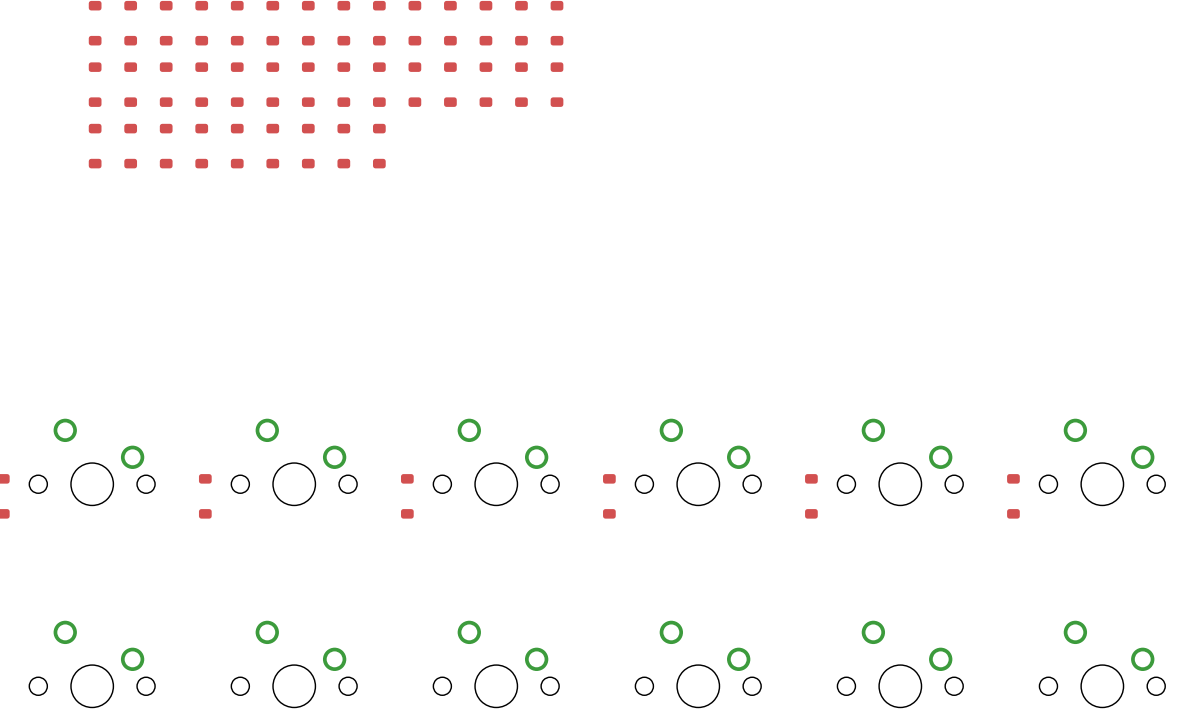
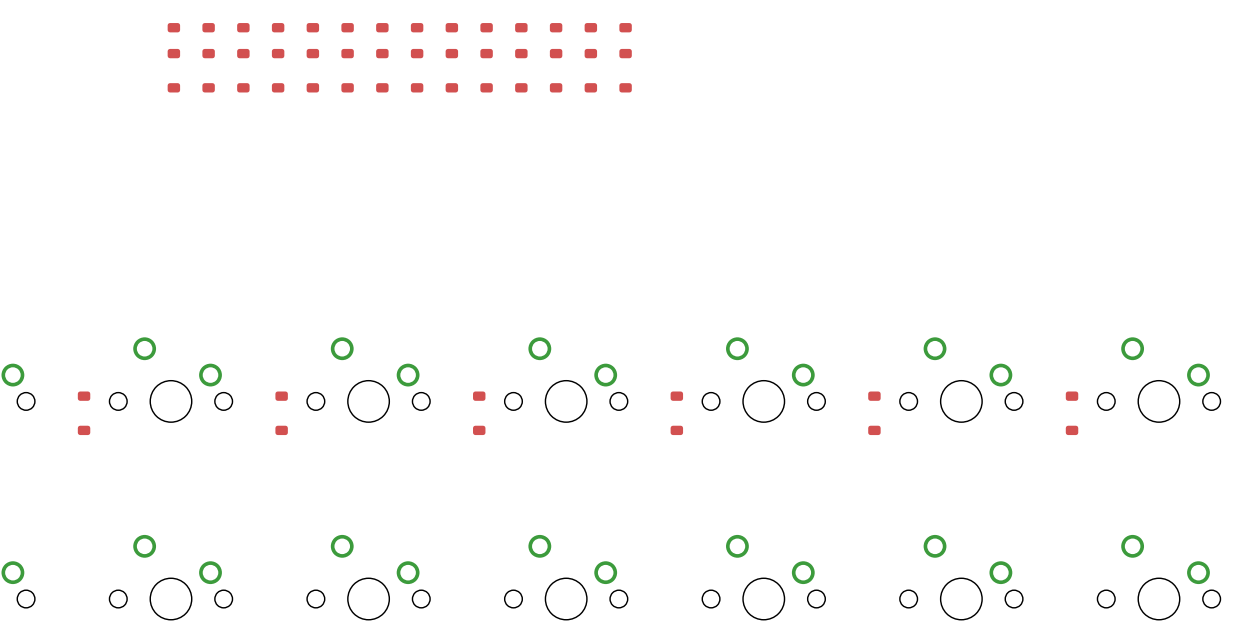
part: none -> (486, 70)
part: none -> (521, 70)
part: none -> (556, 70)
part: none -> (590, 70)
part: none -> (625, 70)

